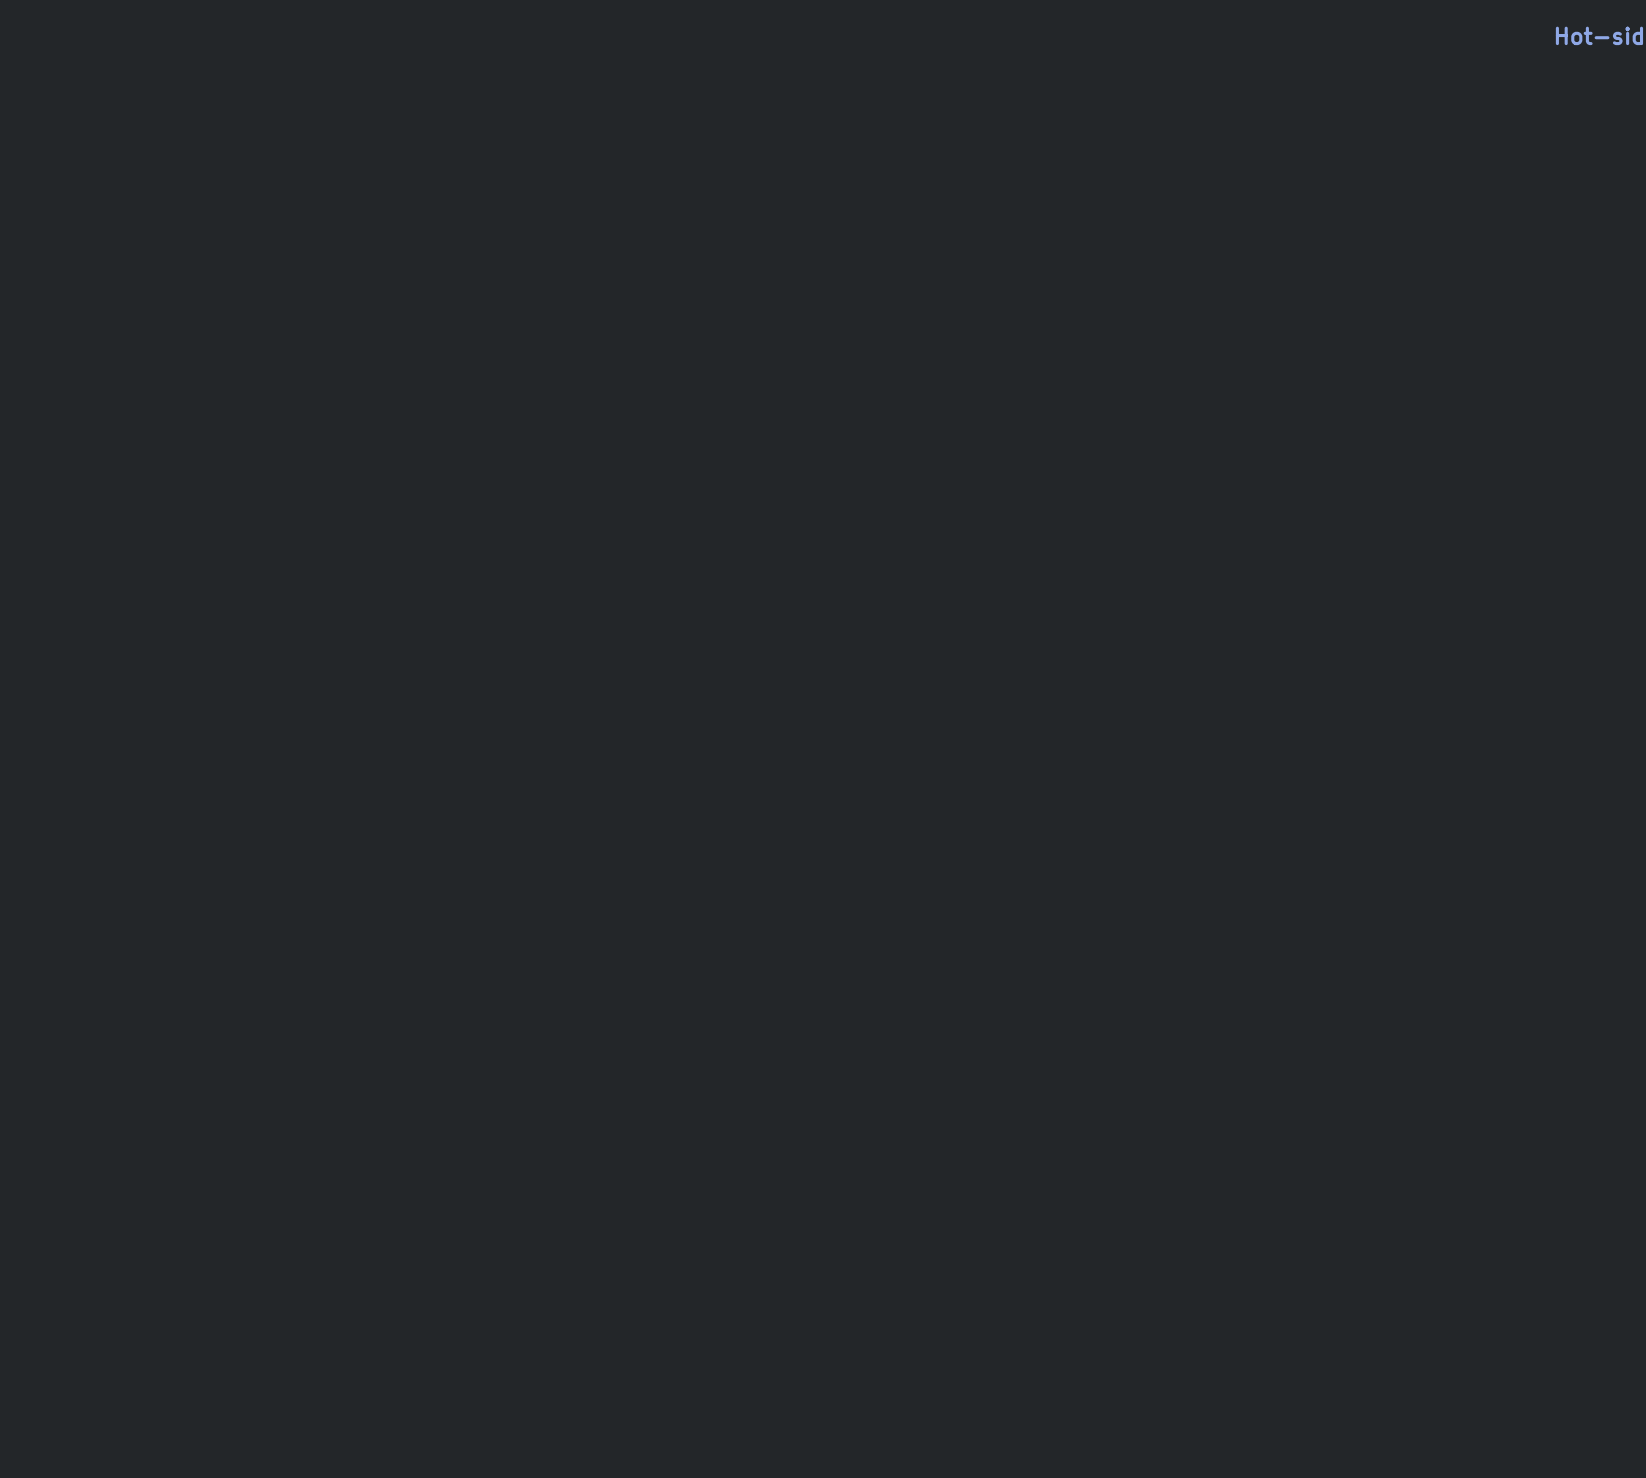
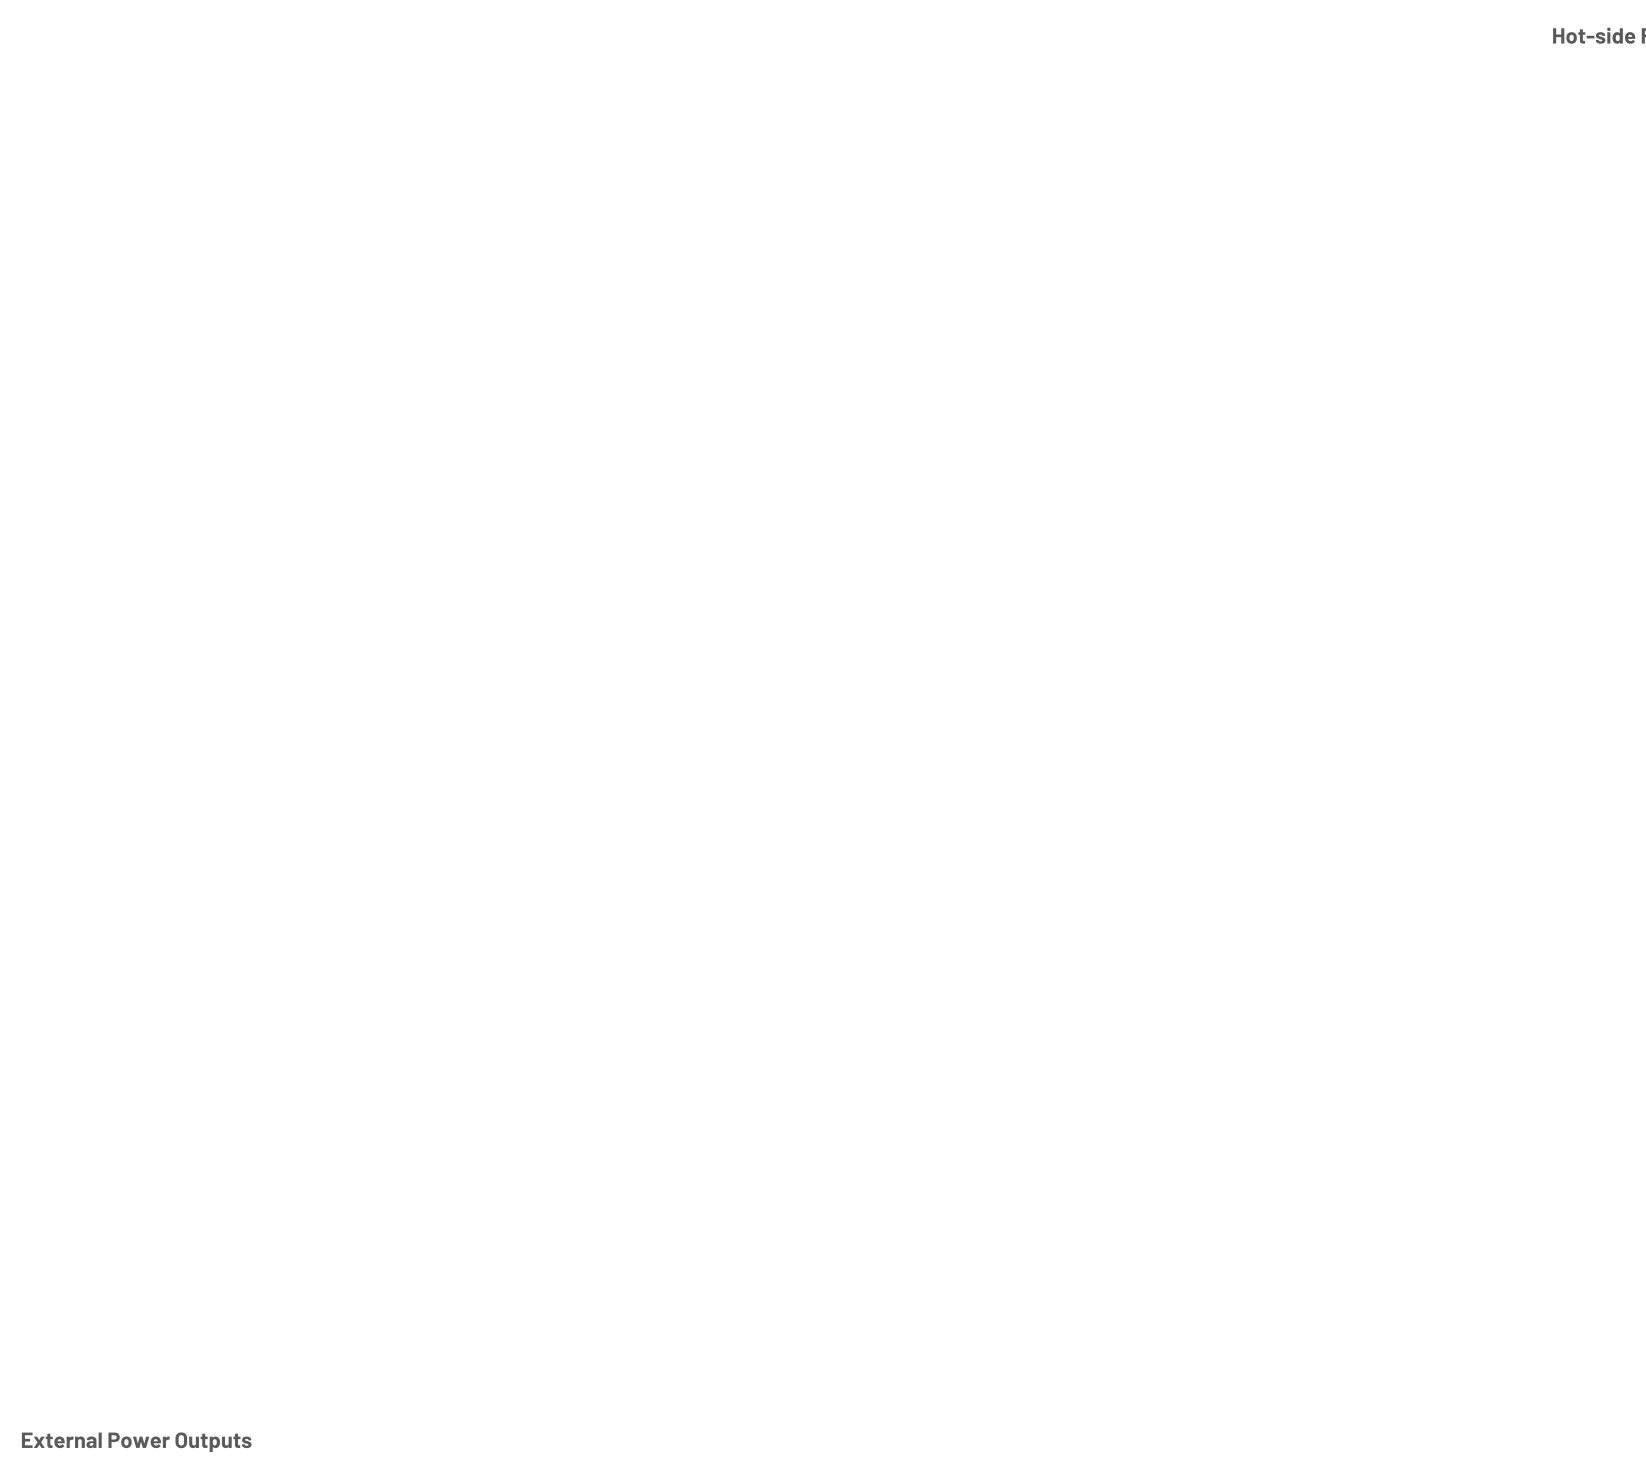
text: none -> External Power Outputs (136, 1442)

